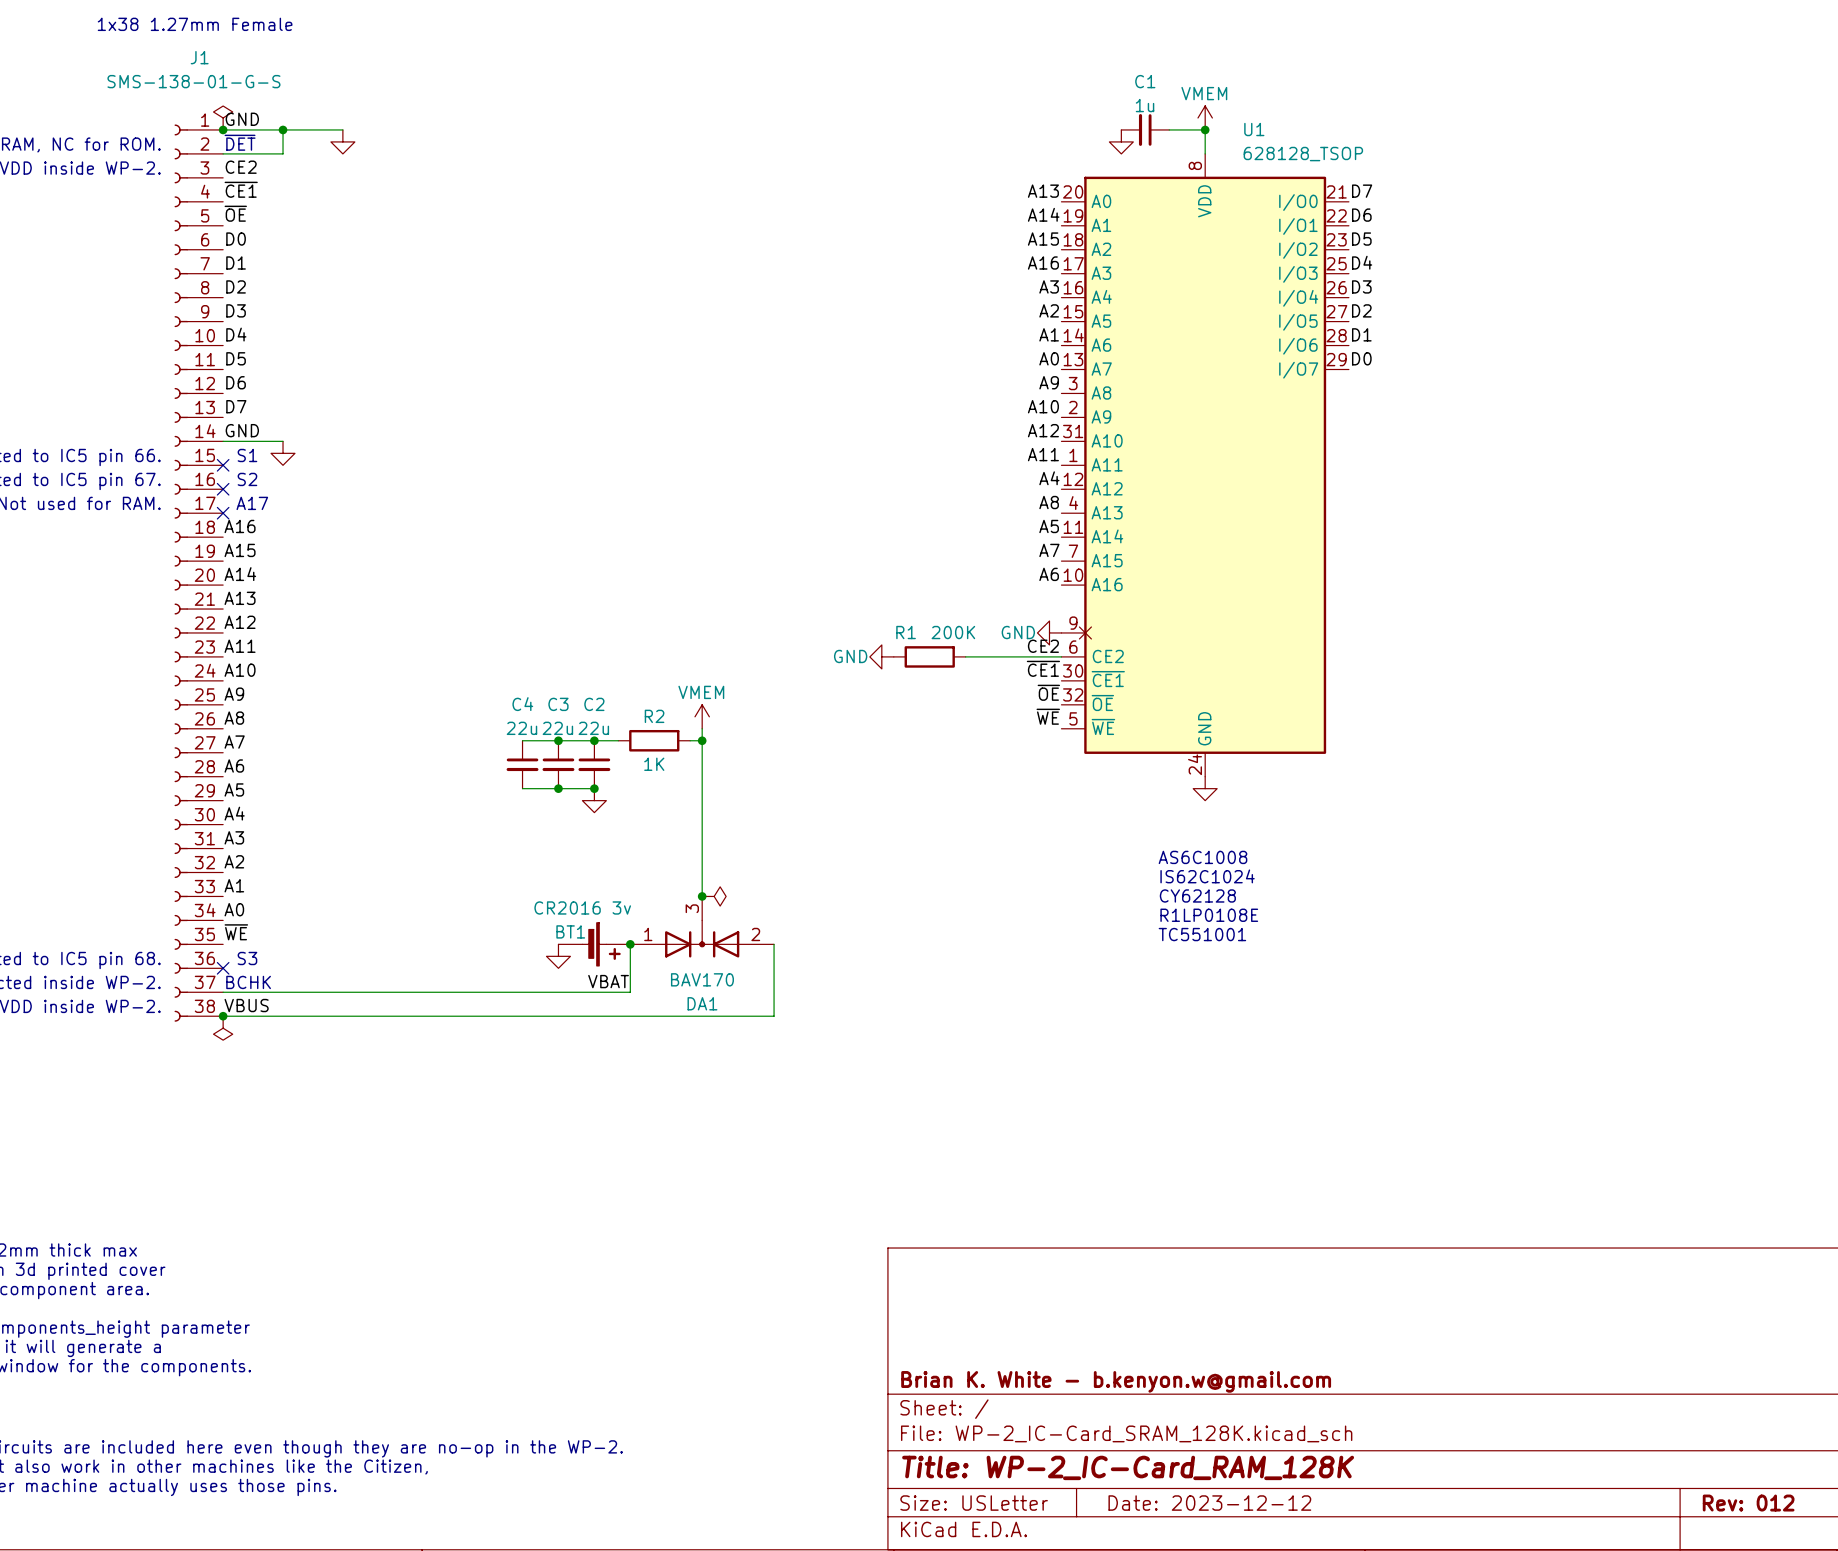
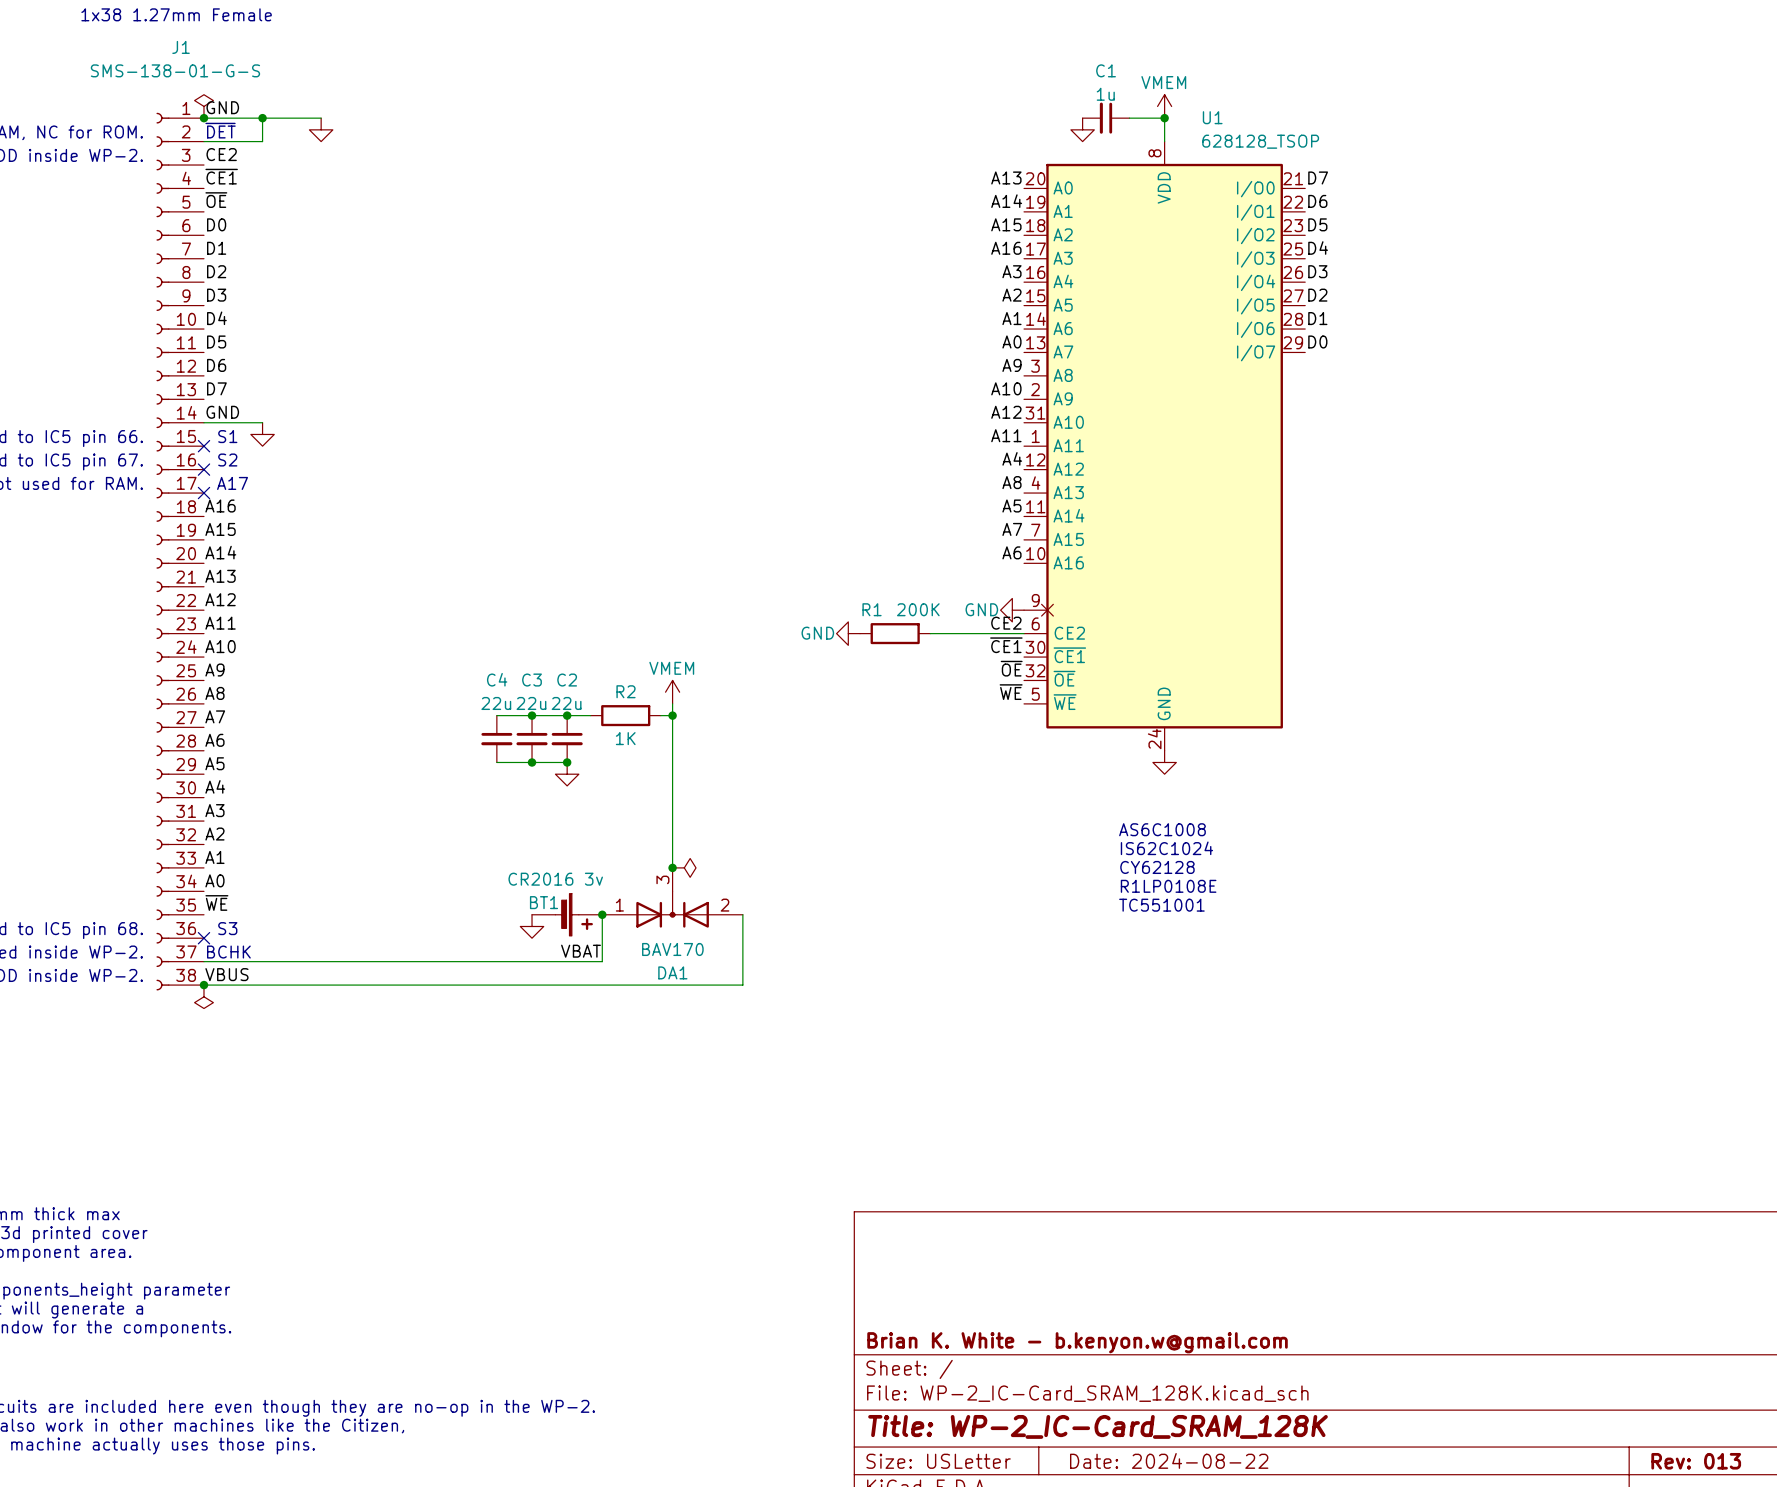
title block: Title: WP-2_IC-Card_RAM_128K (1128, 1467) -> Title: WP-2_IC-Card_SRAM_128K (1098, 1426)
title block: Date: 2023-12-12 (1209, 1503) -> Date: 2024-08-22 (1169, 1460)
title block: Rev: 012 (1748, 1503) -> Rev: 013 (1696, 1461)

